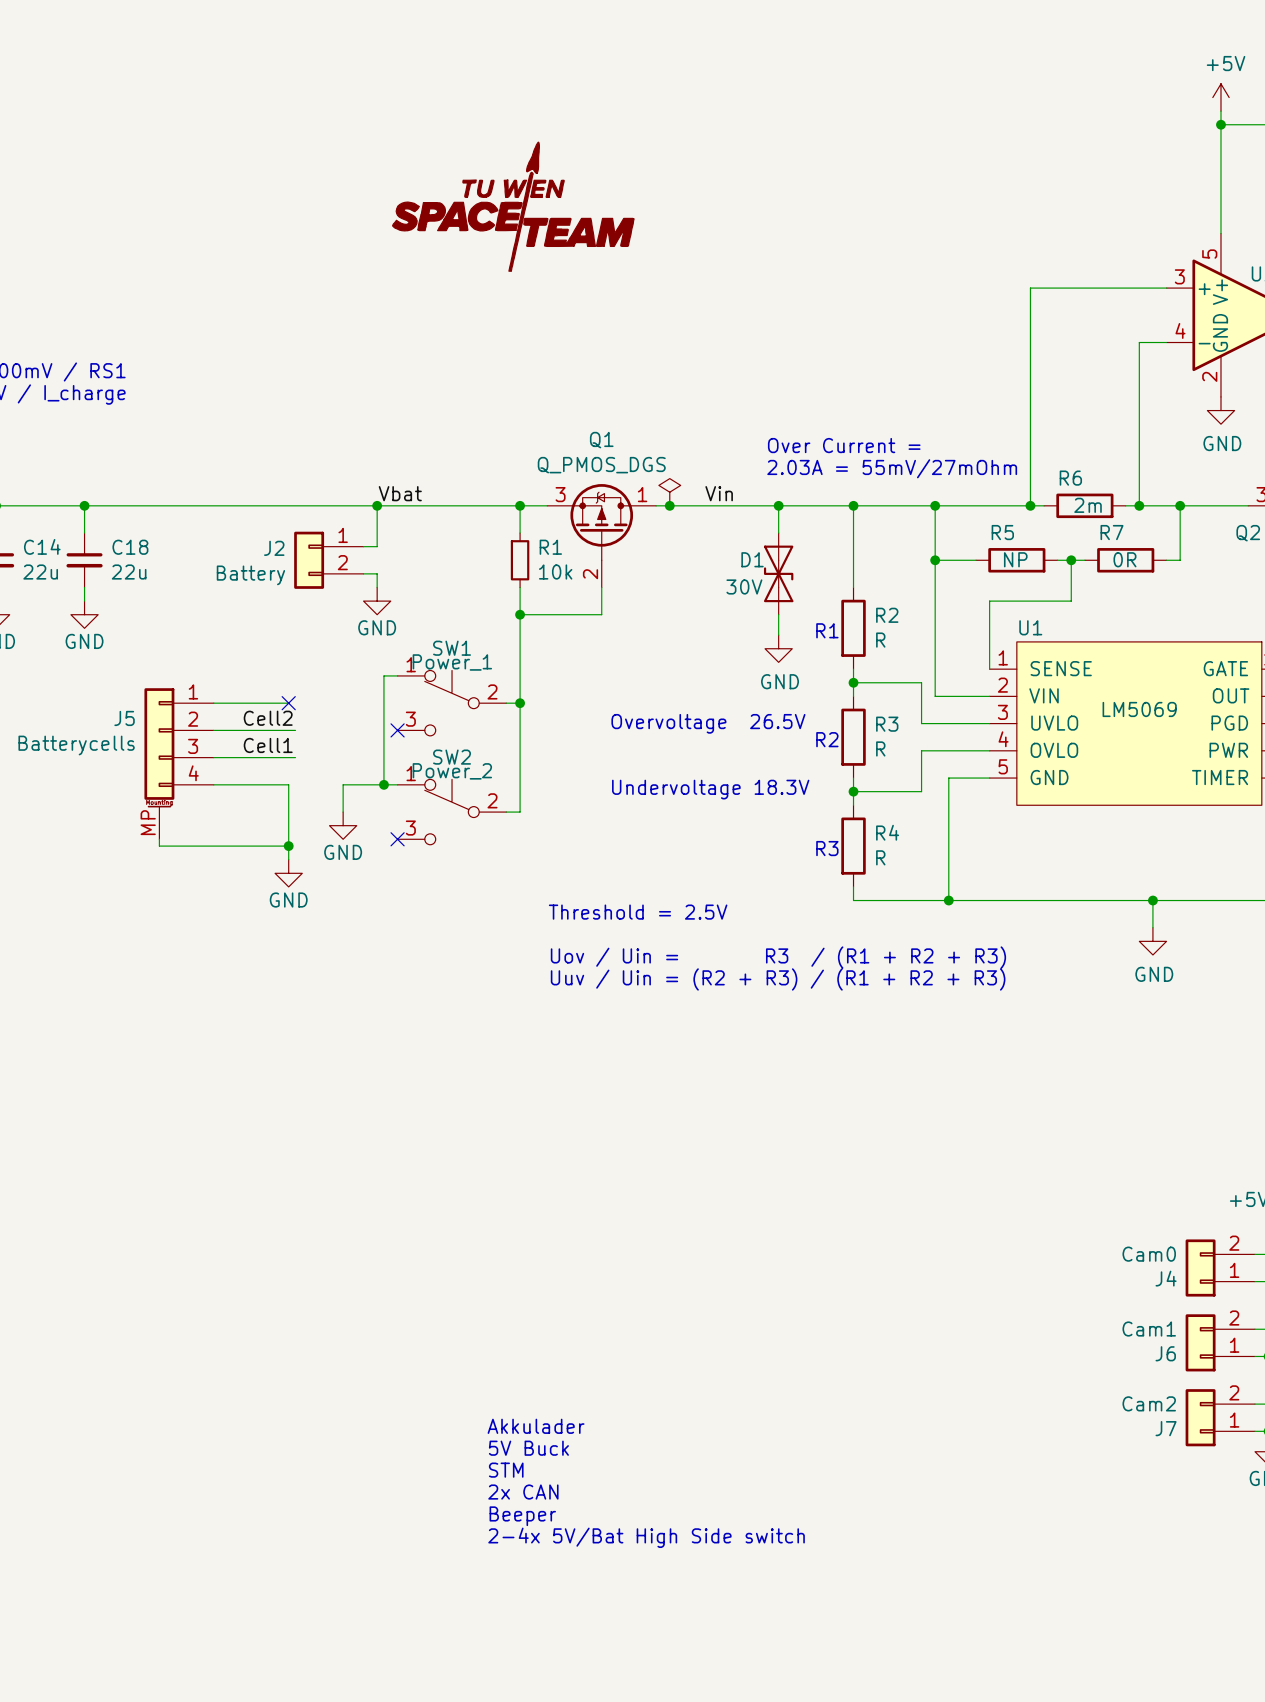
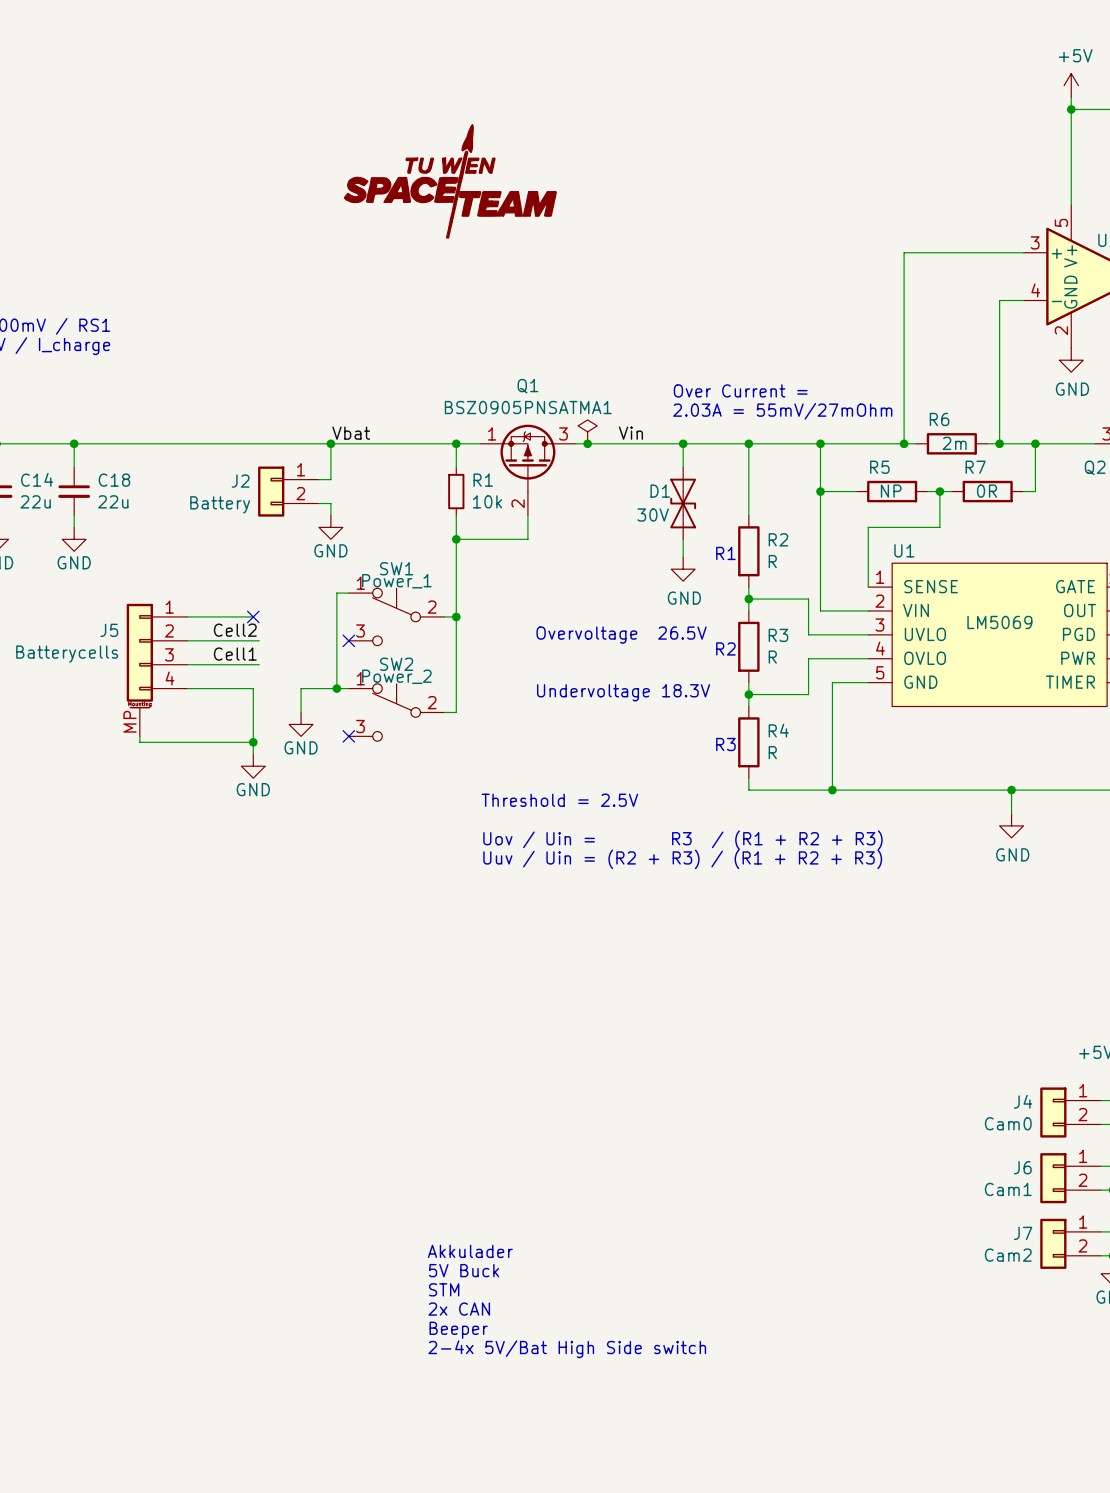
Q1 value: Q_PMOS_DGS (601, 465) -> BSZ0905PNSATMA1 (528, 407)
Q1 pin number: 3 (560, 494) -> 1 (492, 433)
Q1 pin number: 1 (642, 494) -> 3 (563, 433)
J4 flip: as is (1200, 1268) -> up-down (1053, 1112)
J6 flip: as is (1200, 1342) -> up-down (1053, 1178)
J7 flip: as is (1200, 1417) -> up-down (1053, 1243)

